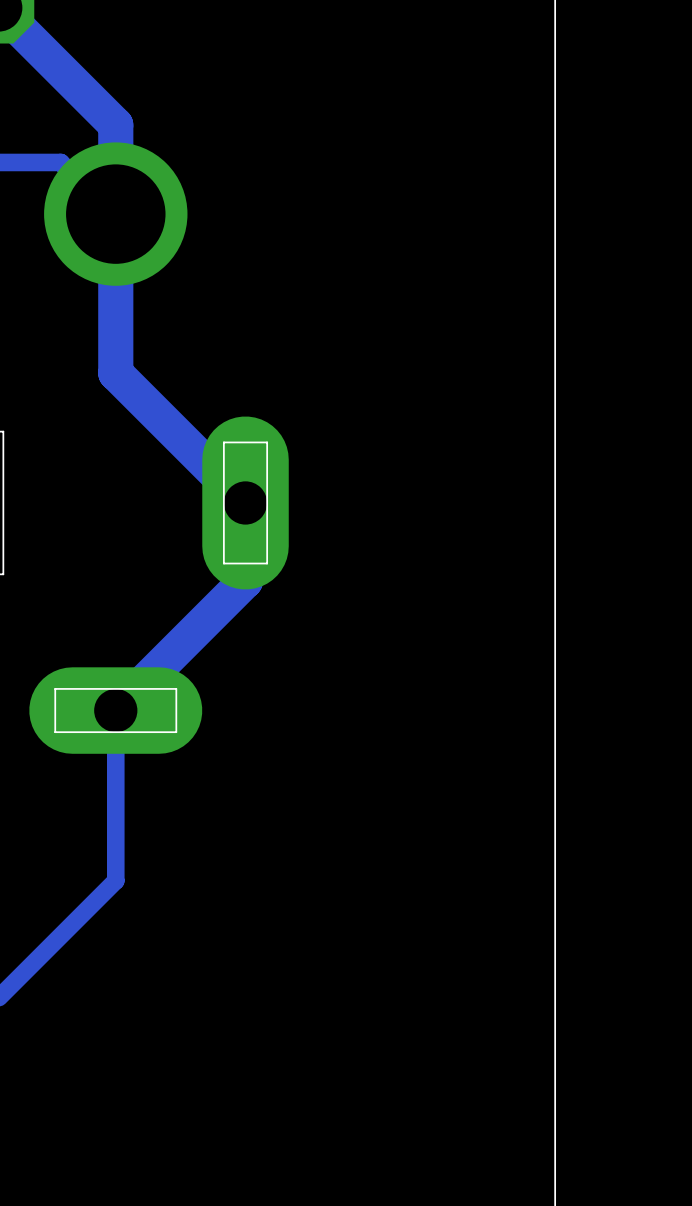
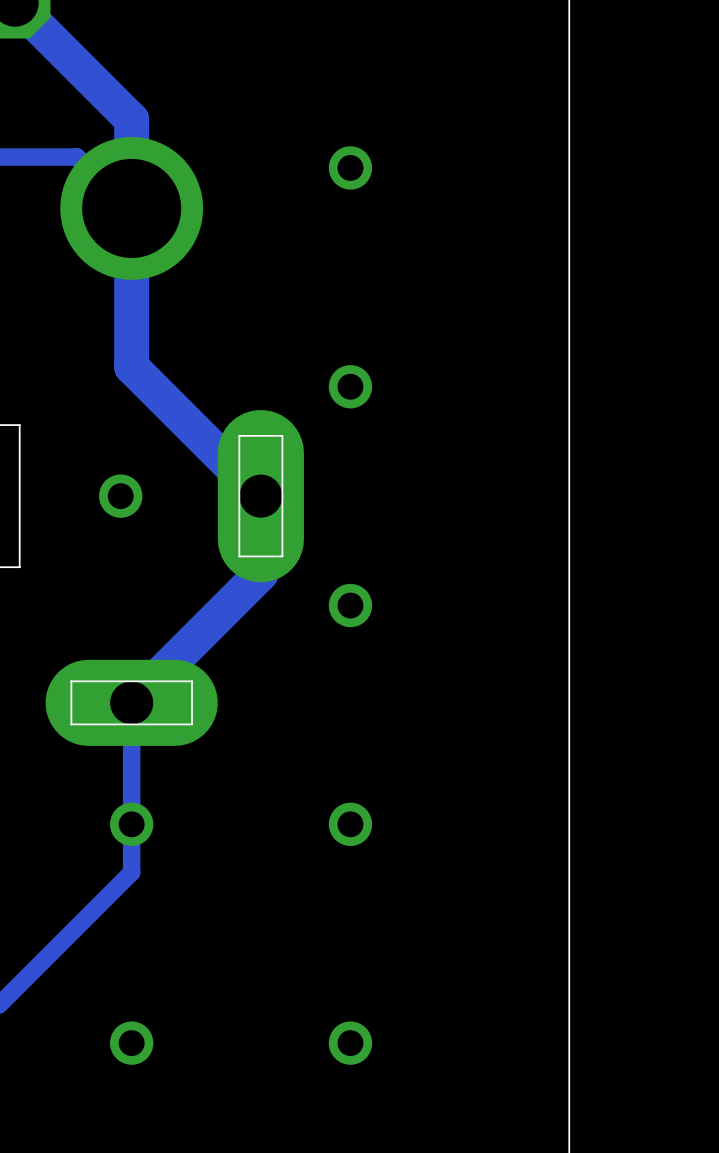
via: none -> (350, 167)
via: none -> (350, 386)
via: none -> (120, 496)
via: none -> (350, 605)
via: none -> (131, 824)
via: none -> (350, 824)
via: none -> (131, 1043)
via: none -> (350, 1043)

